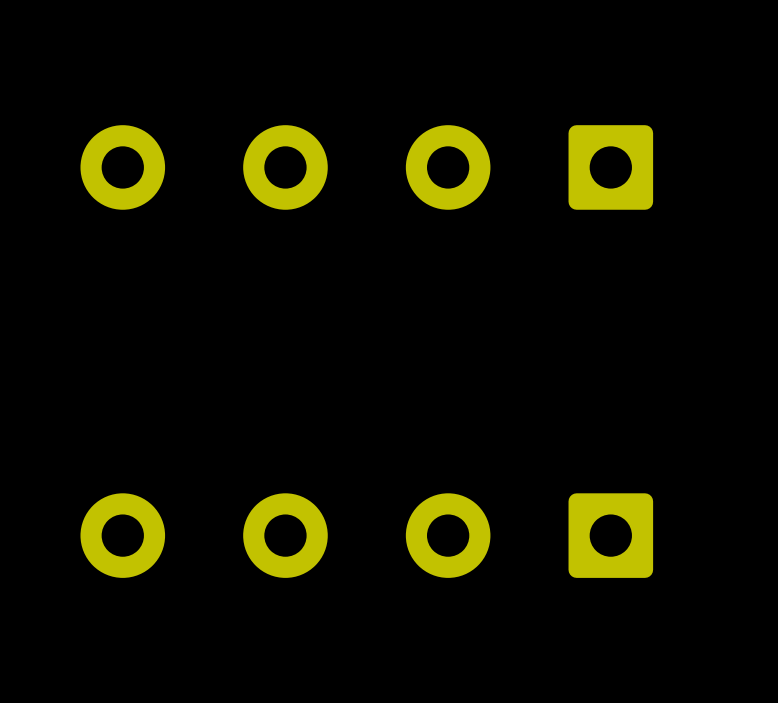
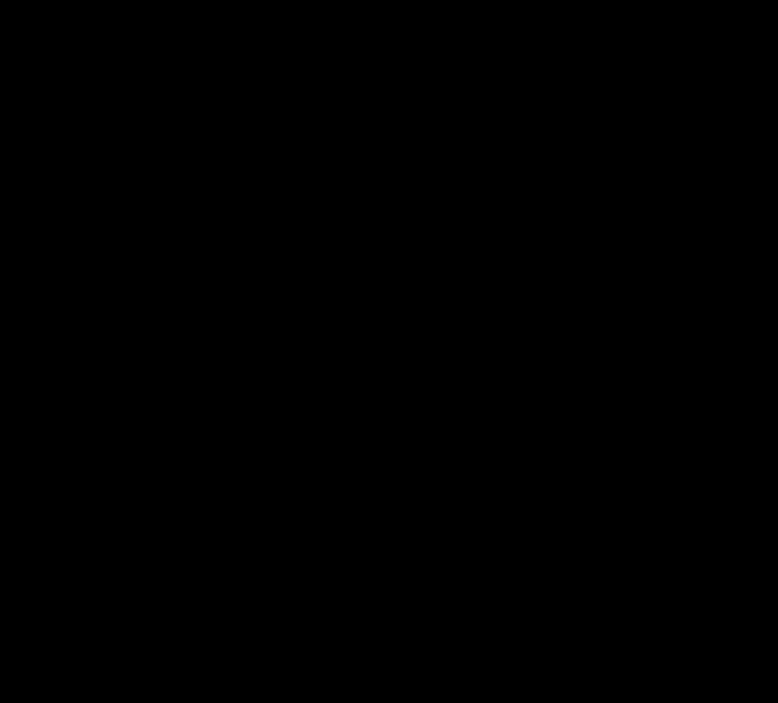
part: (366, 167) -> none
part: (366, 535) -> none

